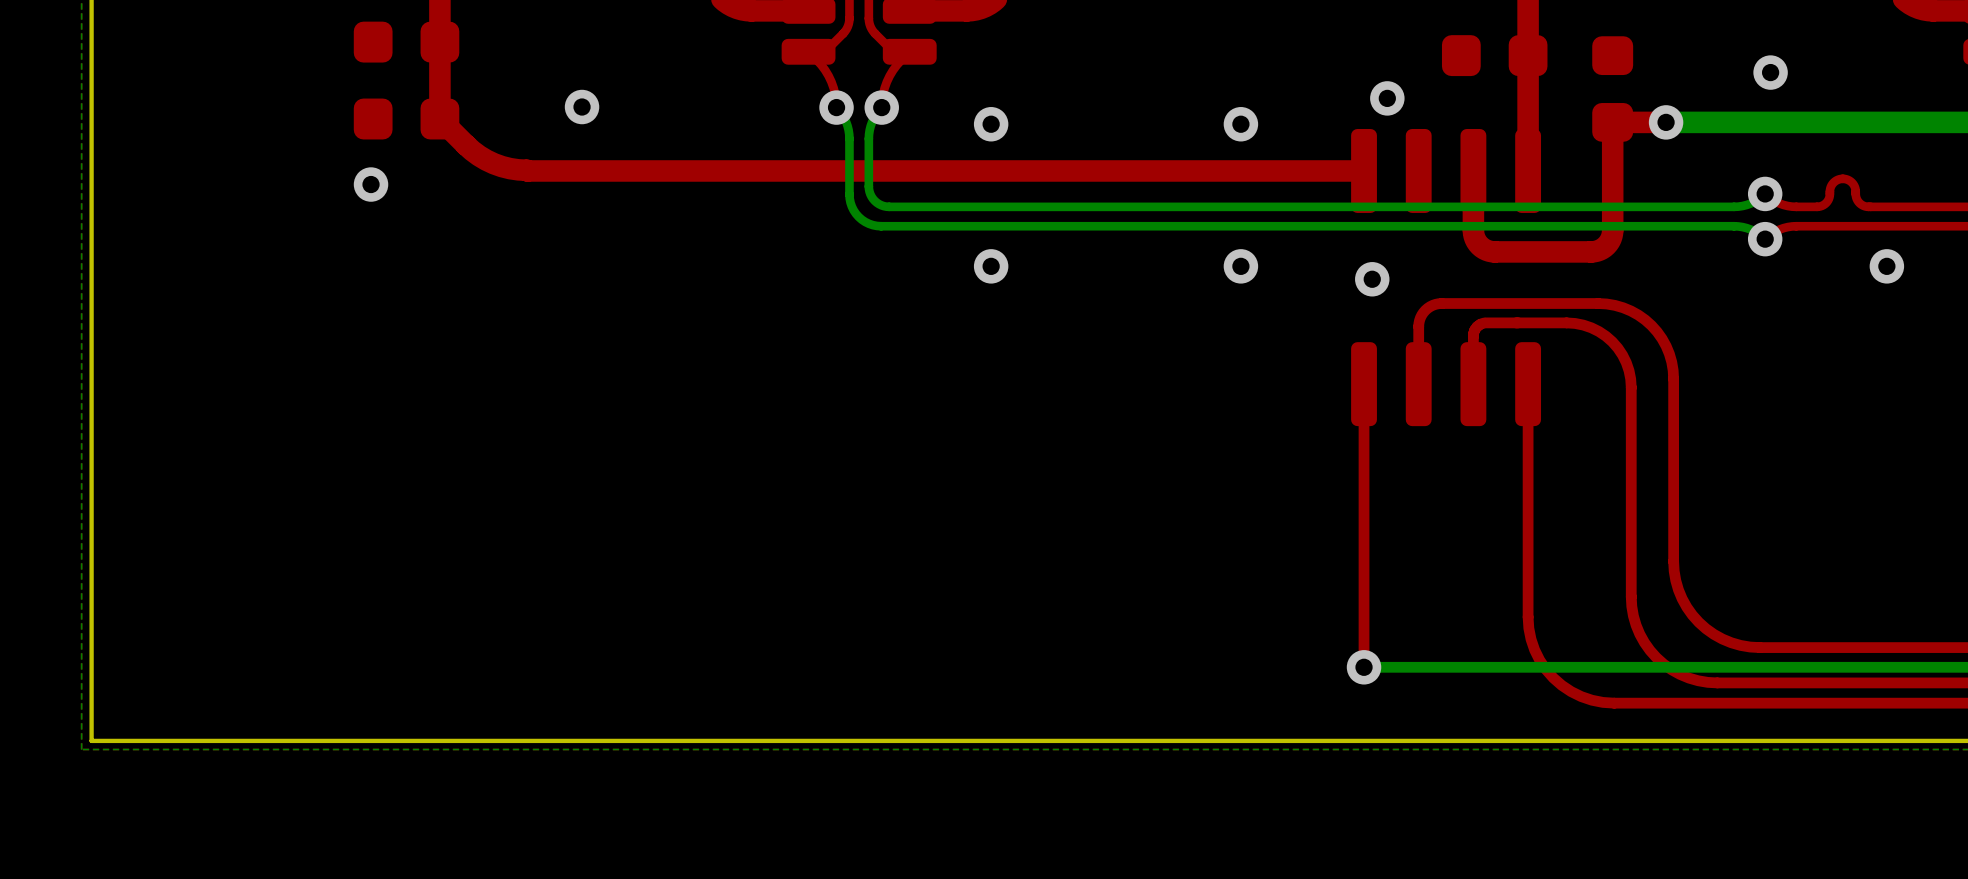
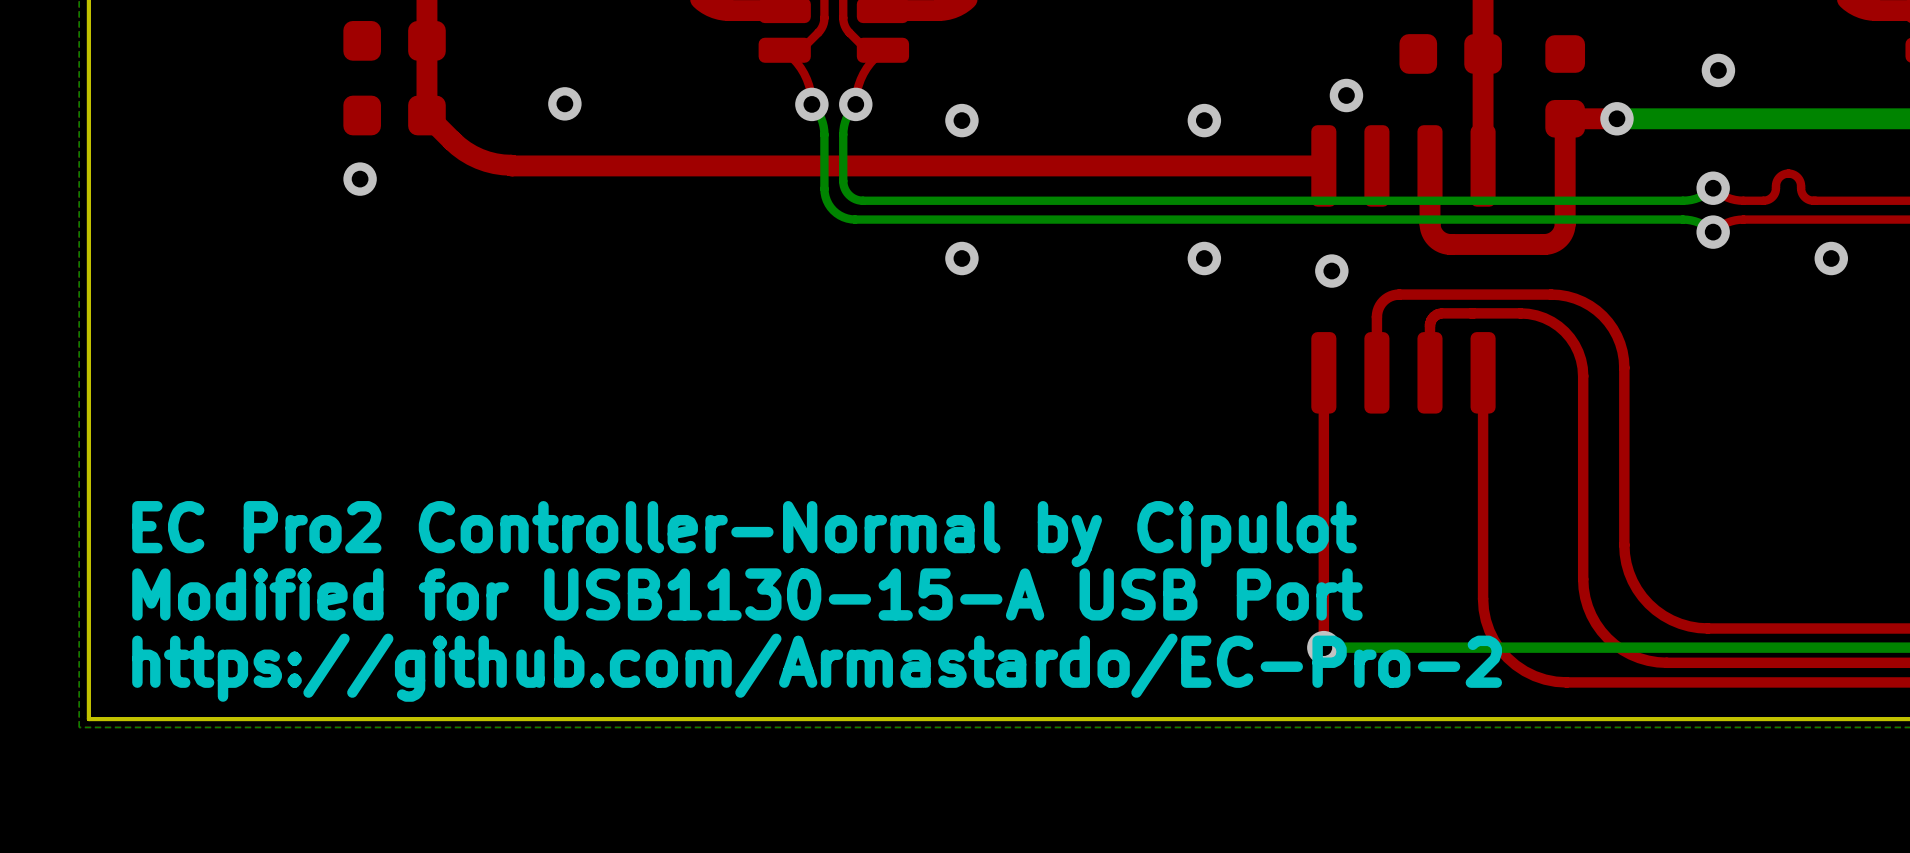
text: none -> EC Pro2 Controller-Normal by Cipulot (744, 534)
text: none -> Modified for USB1130-15-A USB Port (747, 594)
text: none -> https://github.com/Armastardo/EC-Pro-2 (817, 667)

